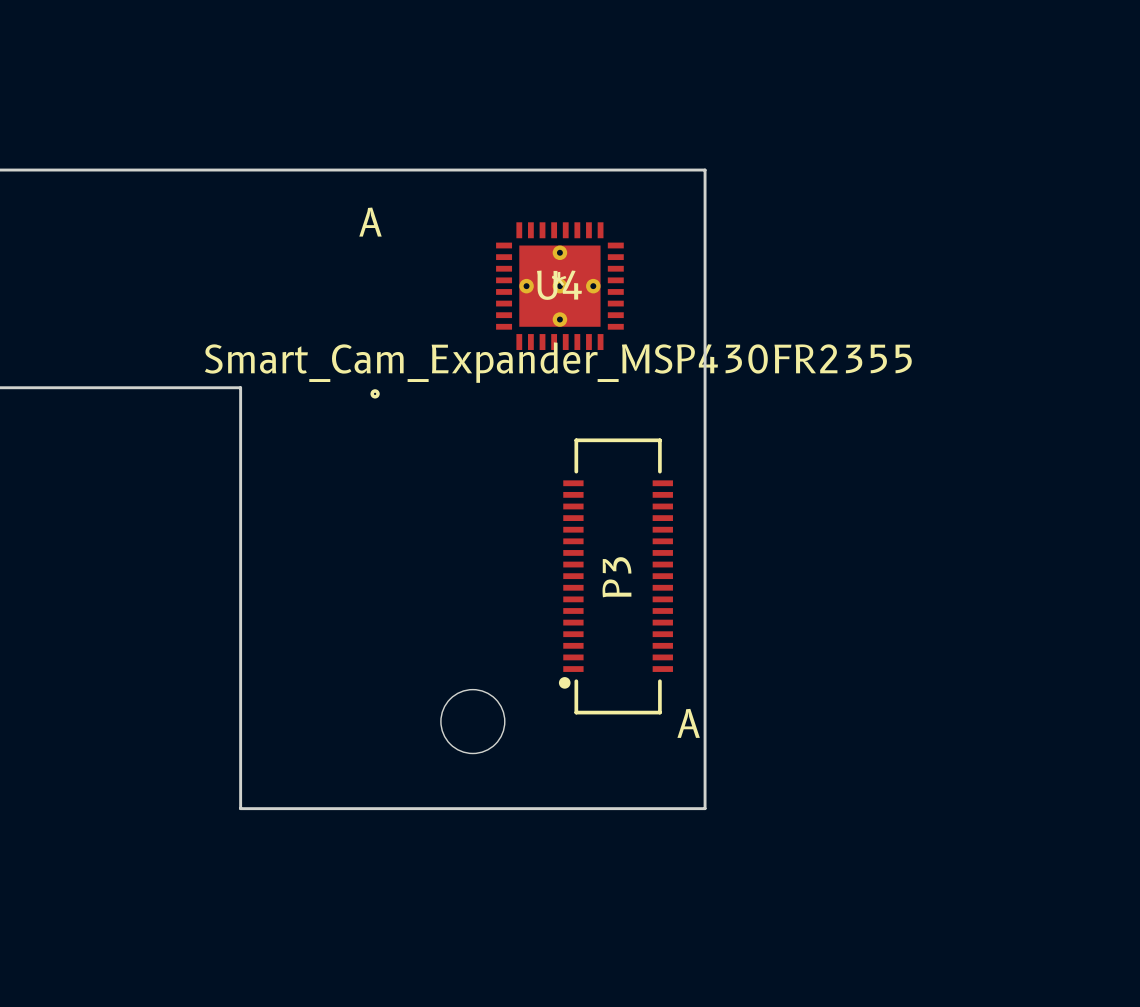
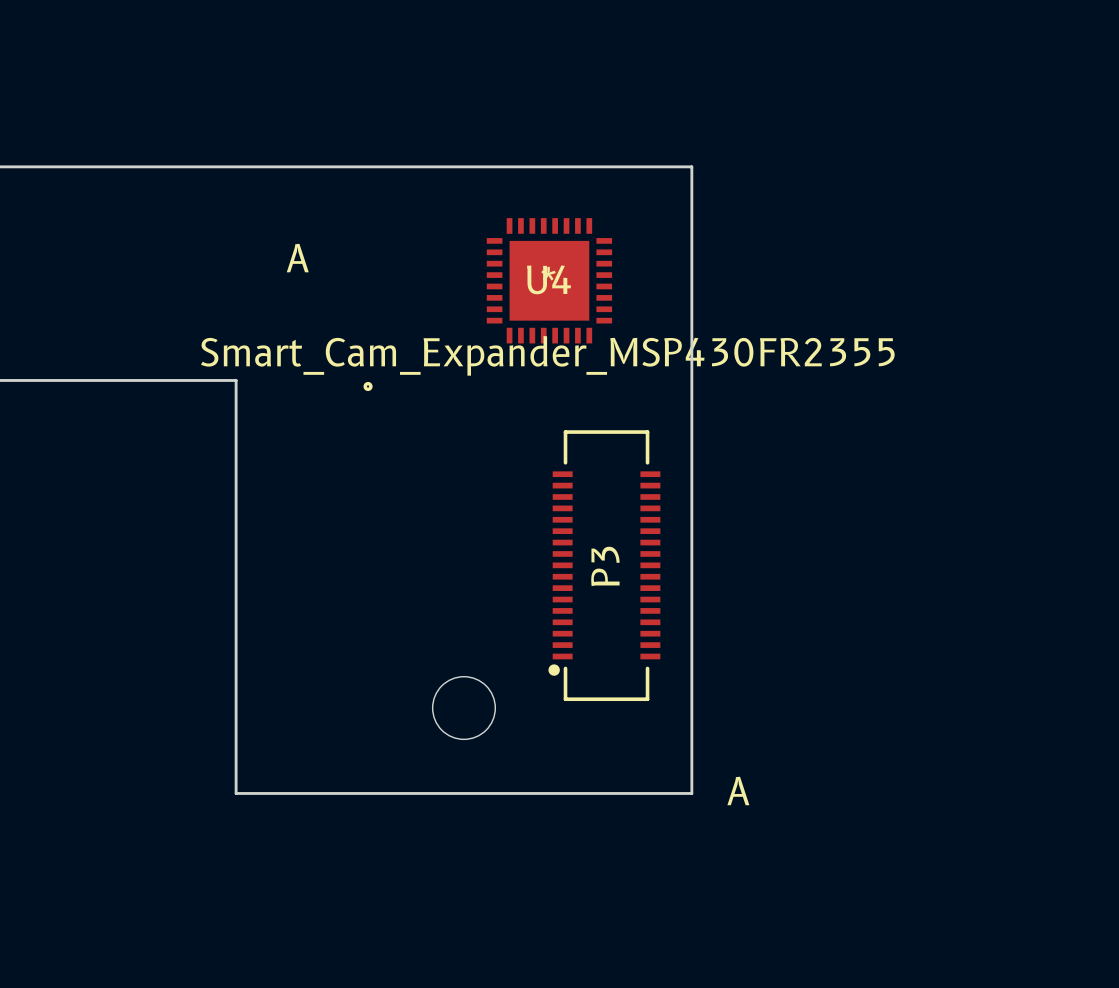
part position: (370, 222) -> (297, 258)
U4 footprint: [496, 222, 624, 351] -> [486, 218, 613, 344]
part position: (688, 723) -> (738, 790)

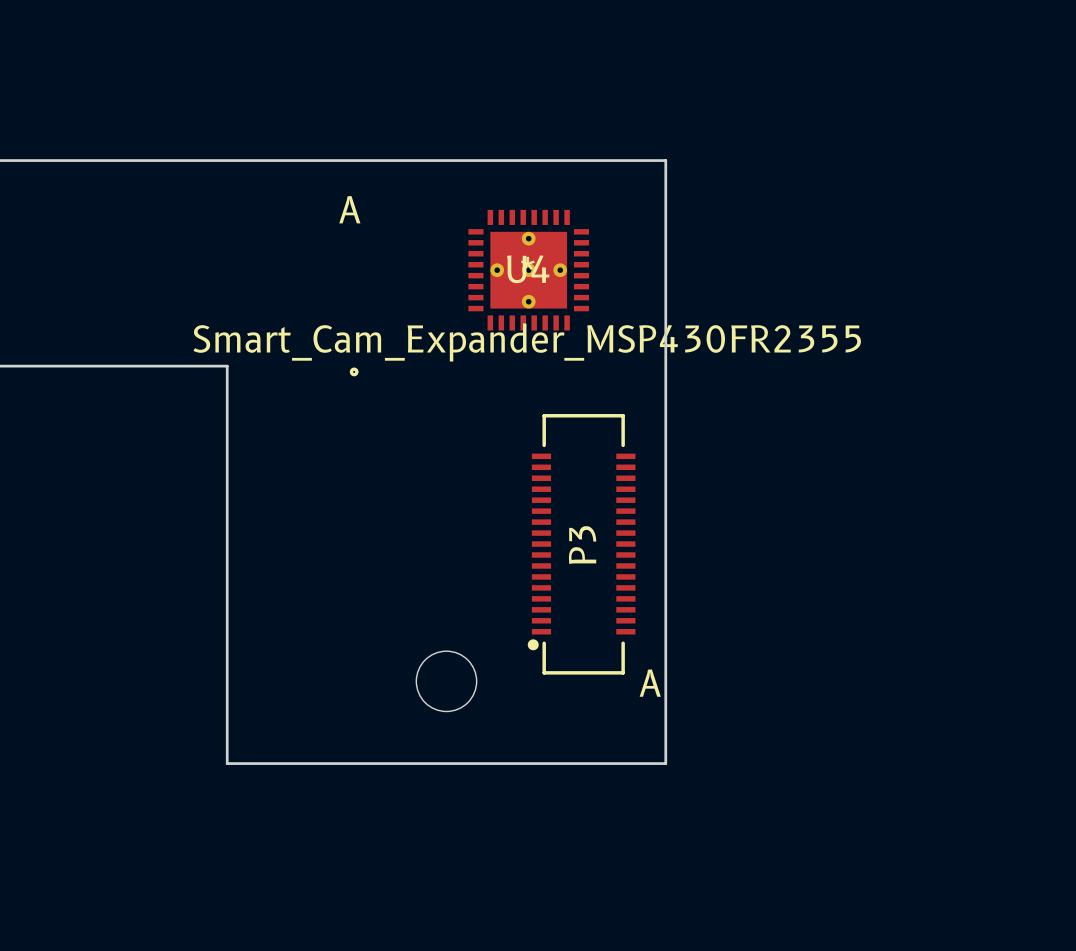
U4 footprint: [486, 218, 613, 344] -> [468, 209, 590, 331]
part position: (297, 258) -> (349, 209)
part position: (738, 790) -> (650, 683)

